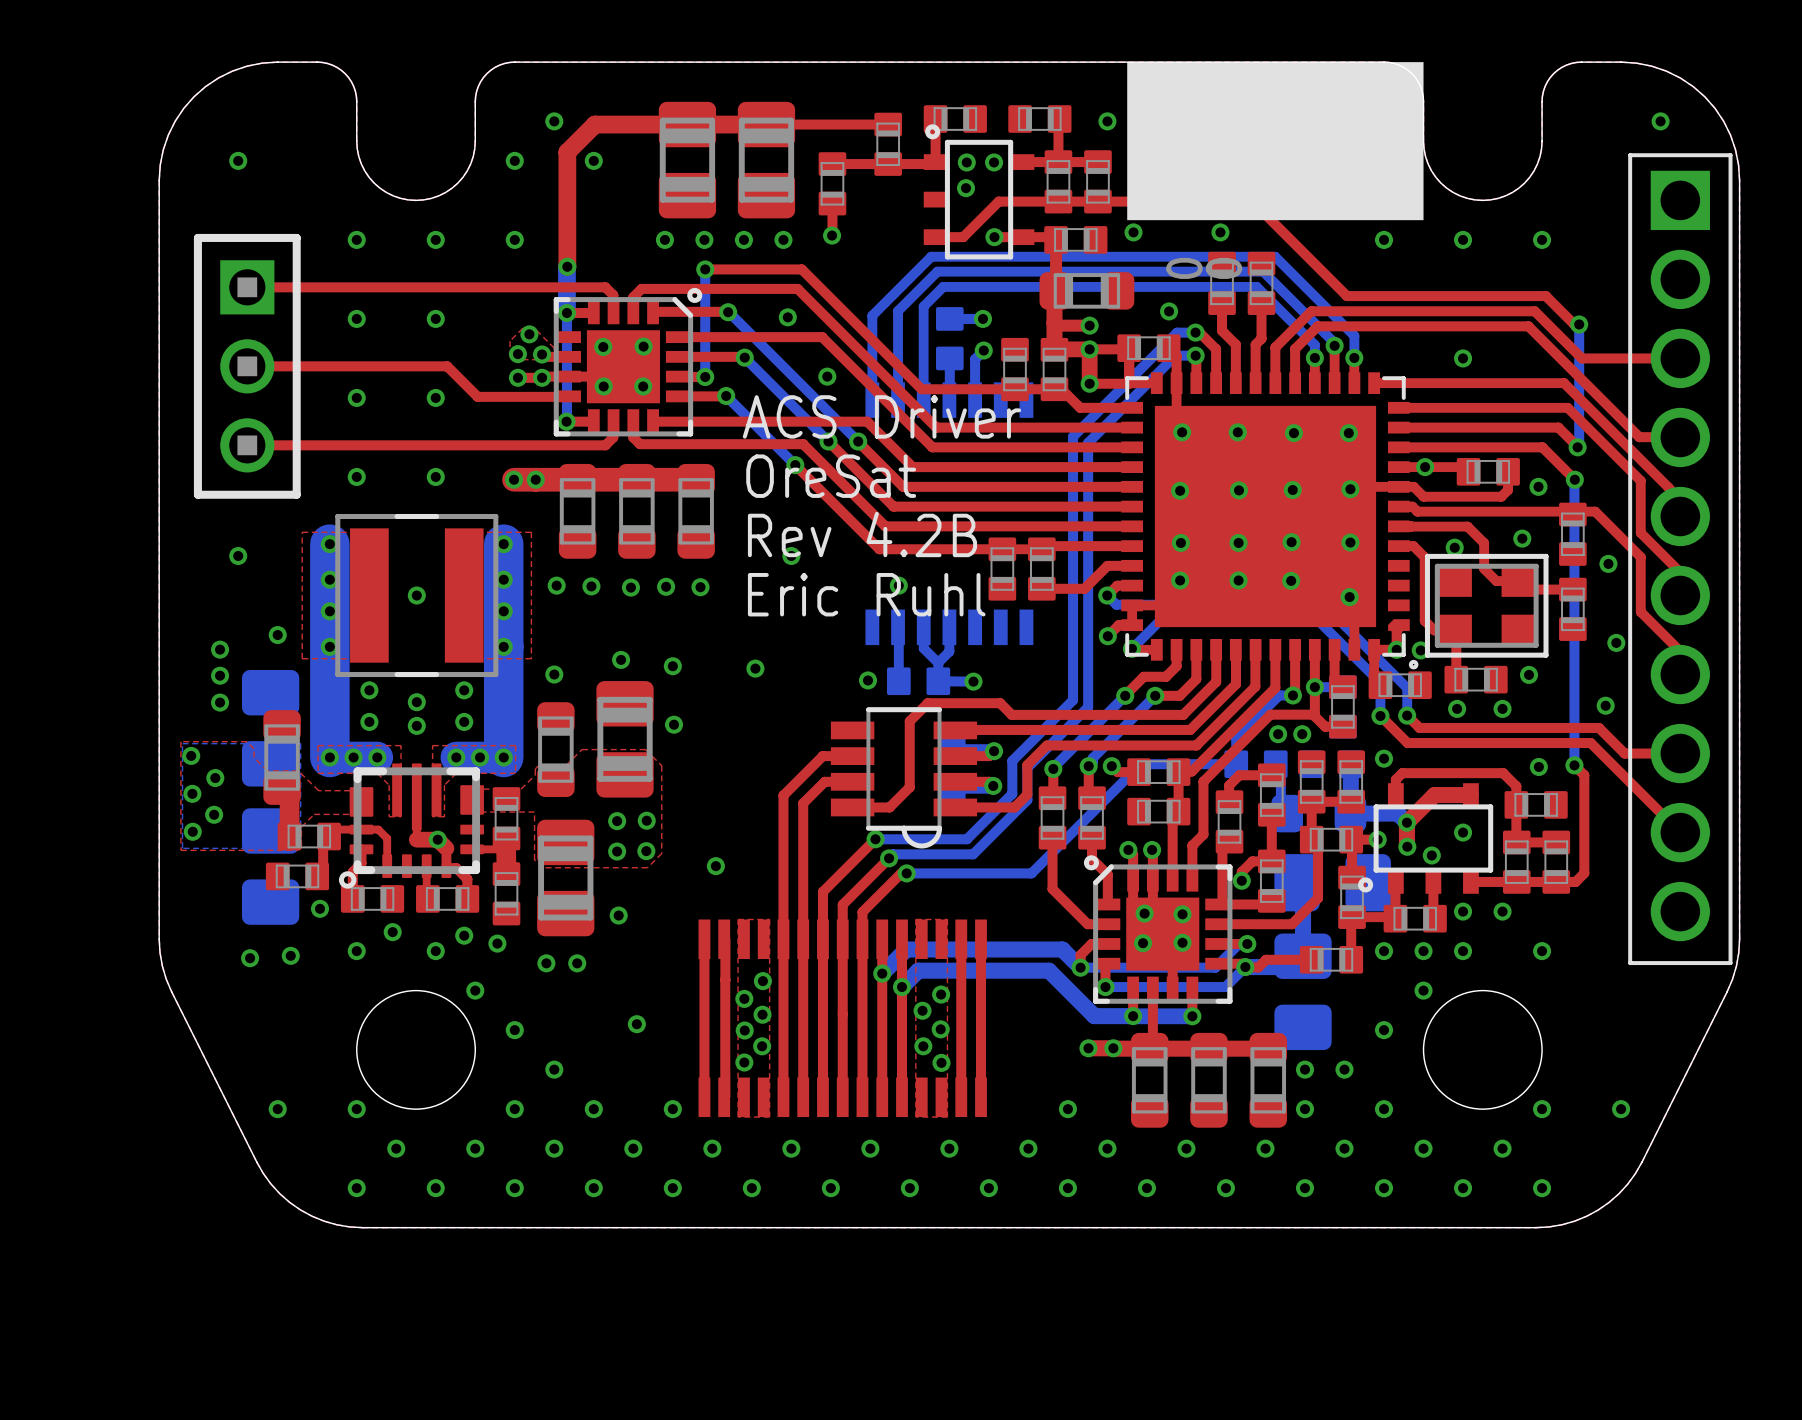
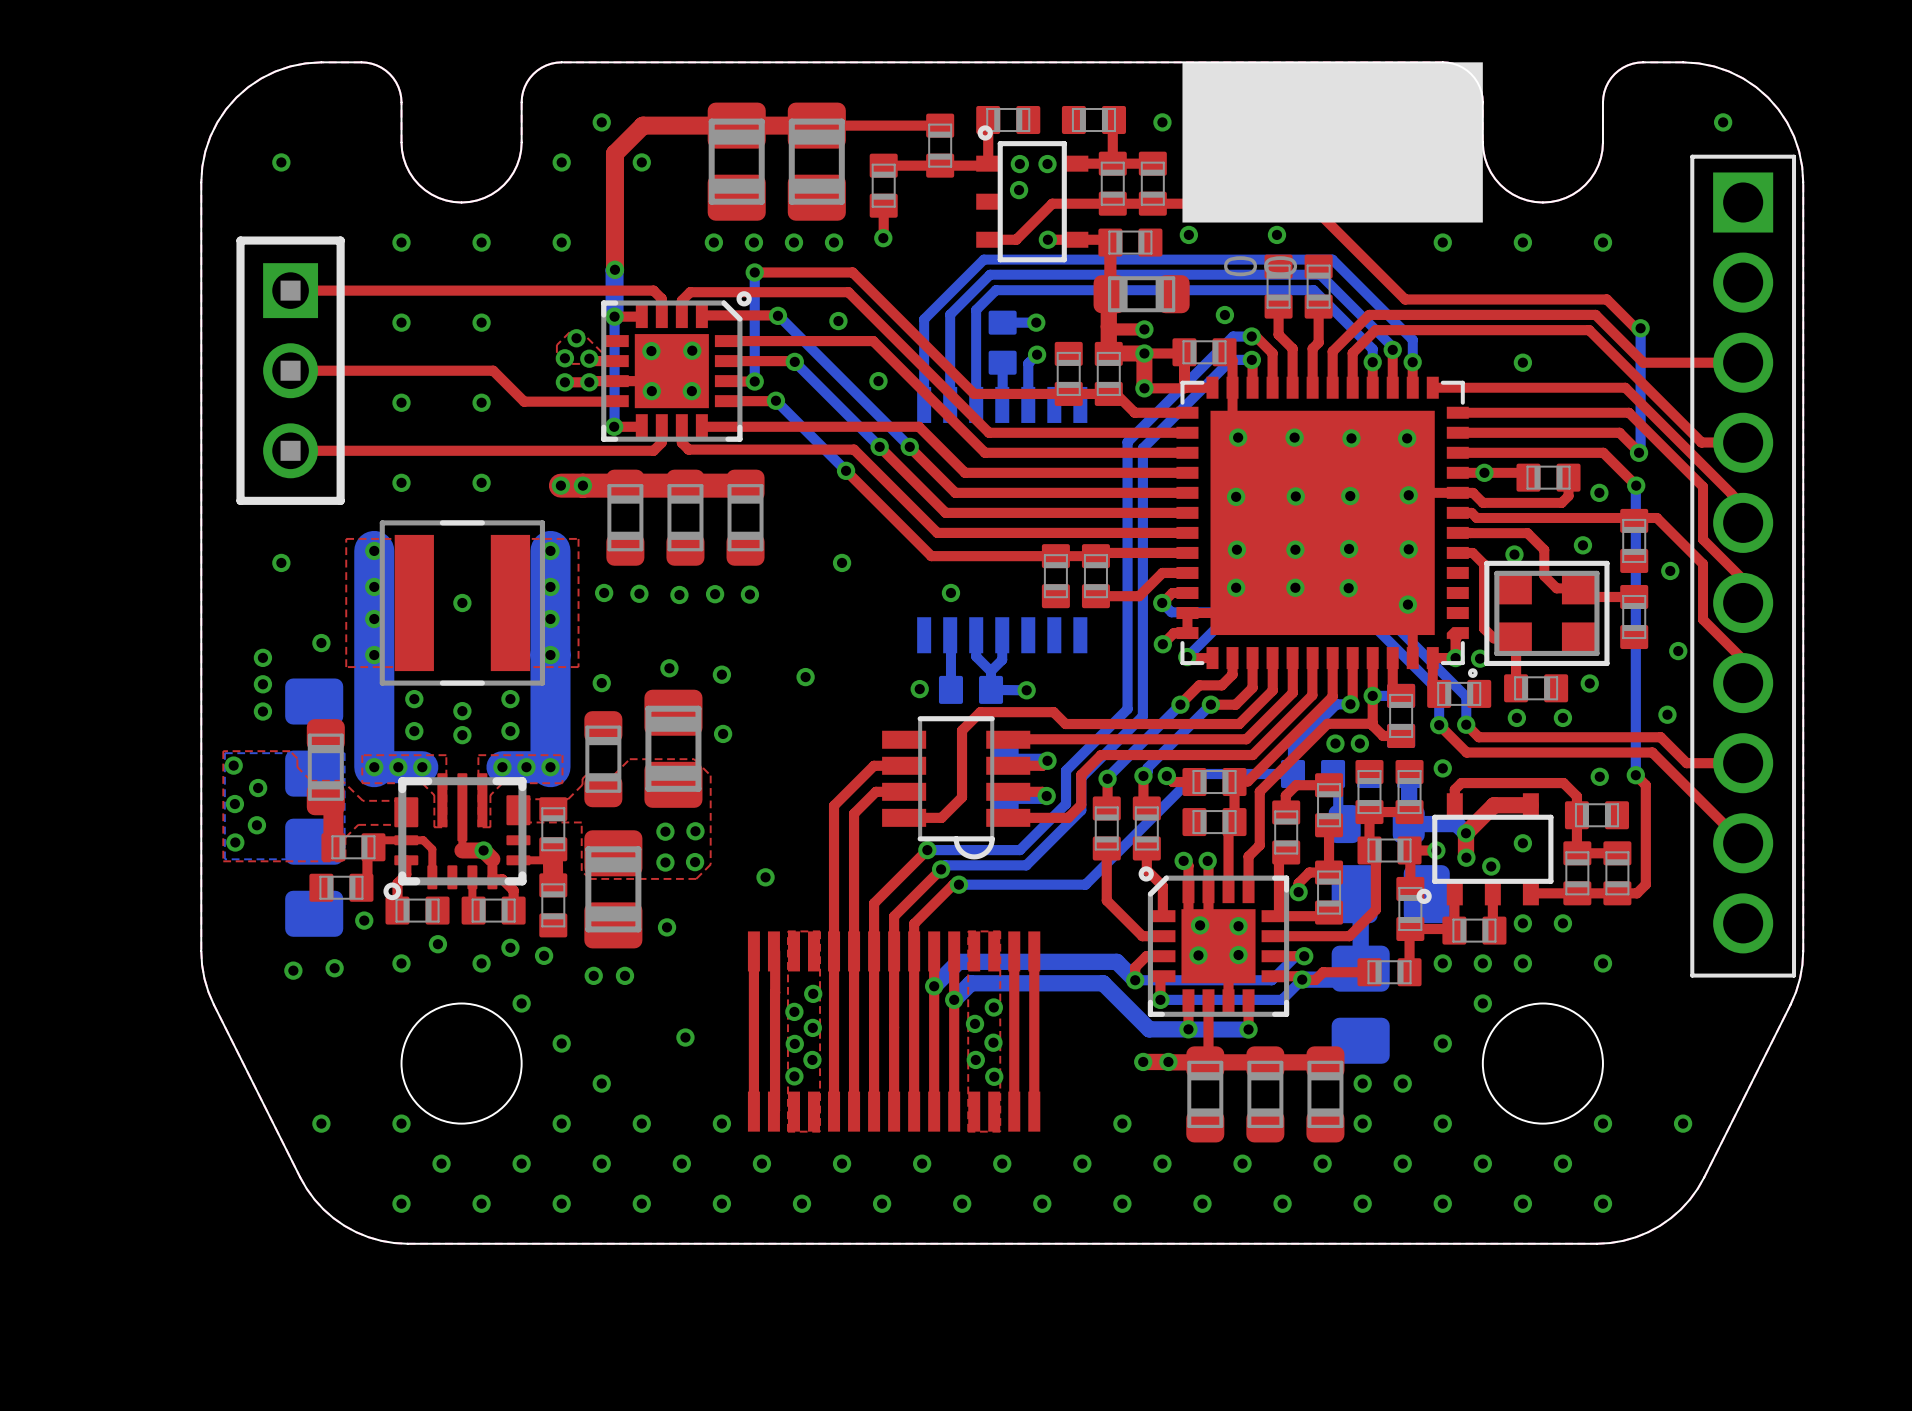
text: ACS Driver (881, 416) -> none
text: OreSat (831, 476) -> none
text: Rev 4.2B (862, 534) -> none
text: Eric Ruhl (866, 594) -> none

